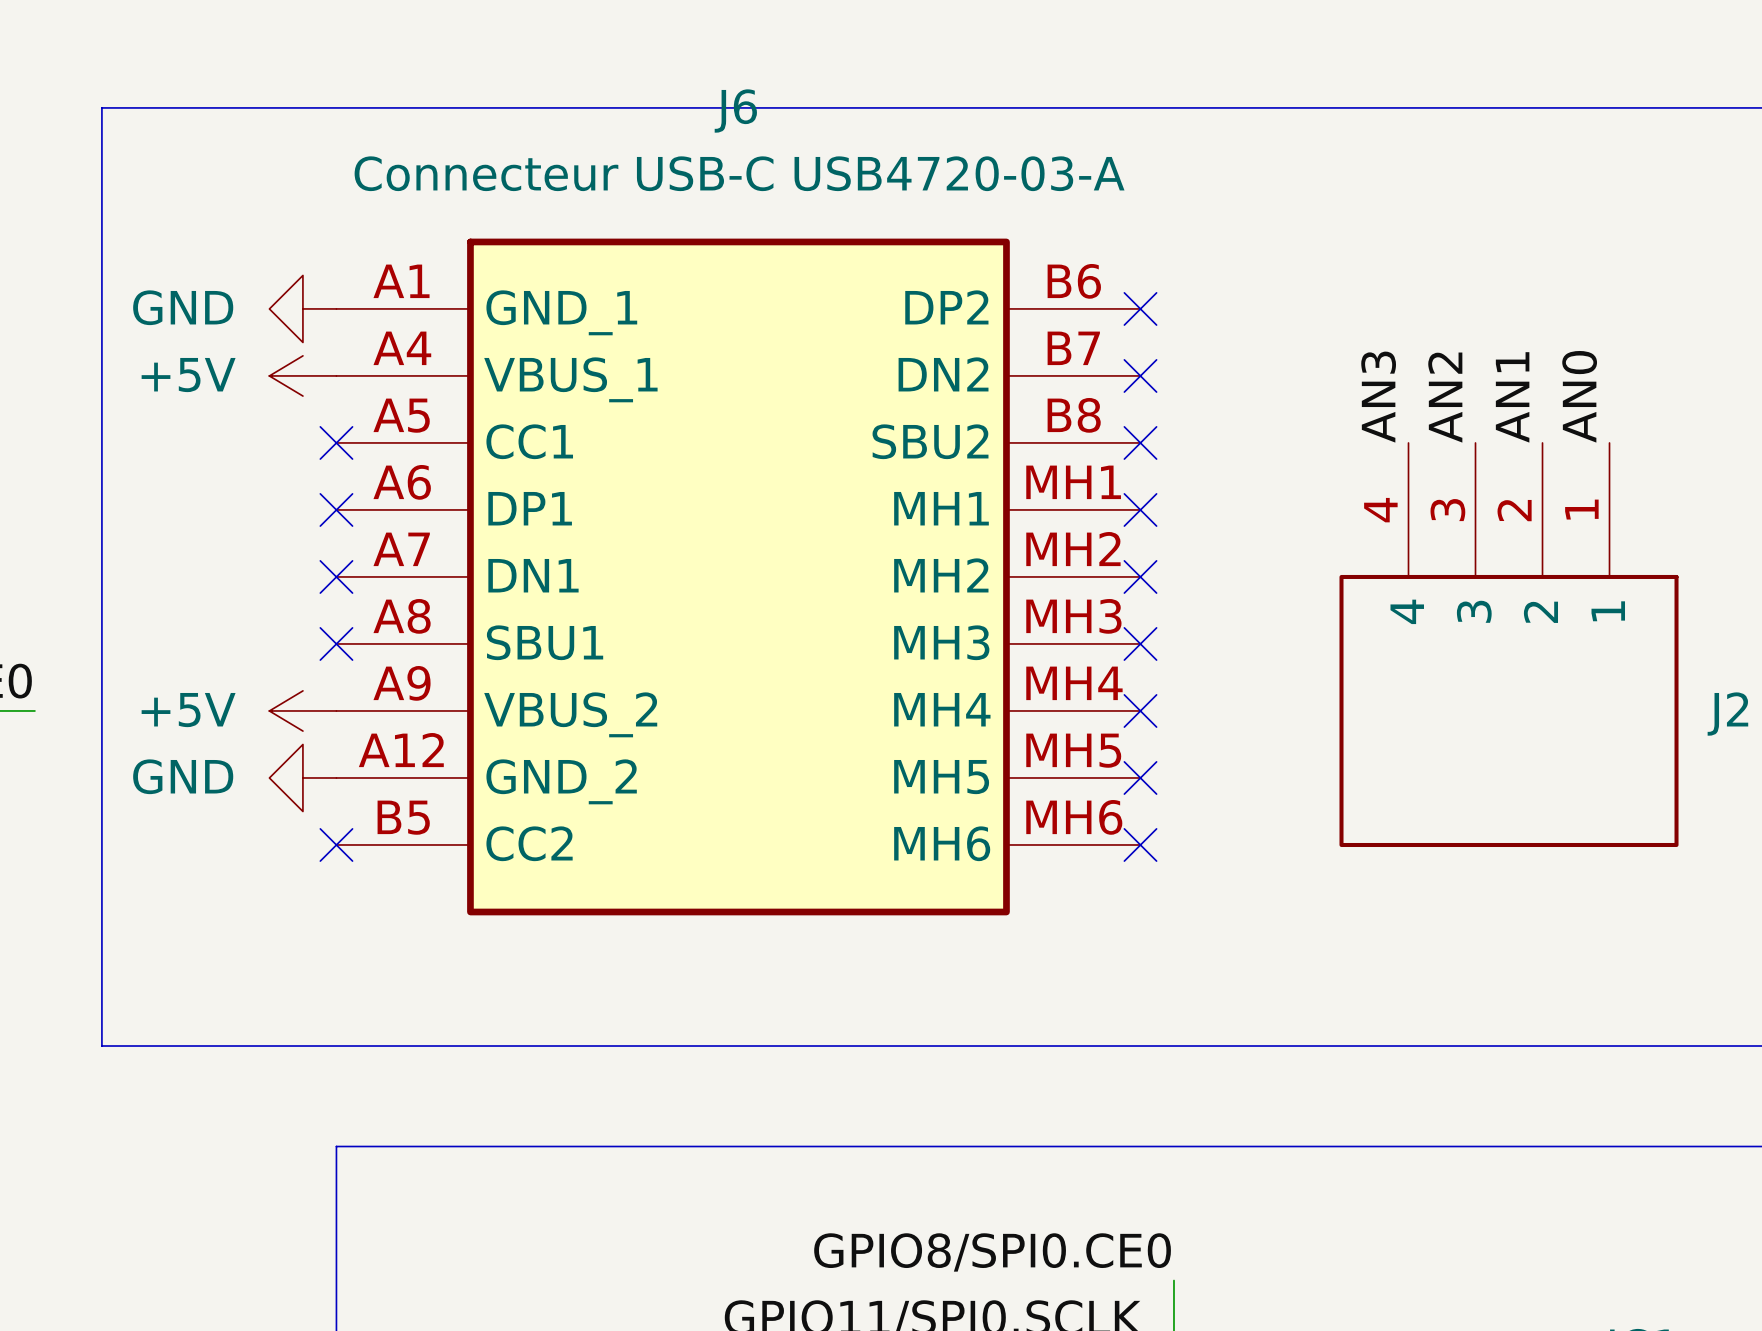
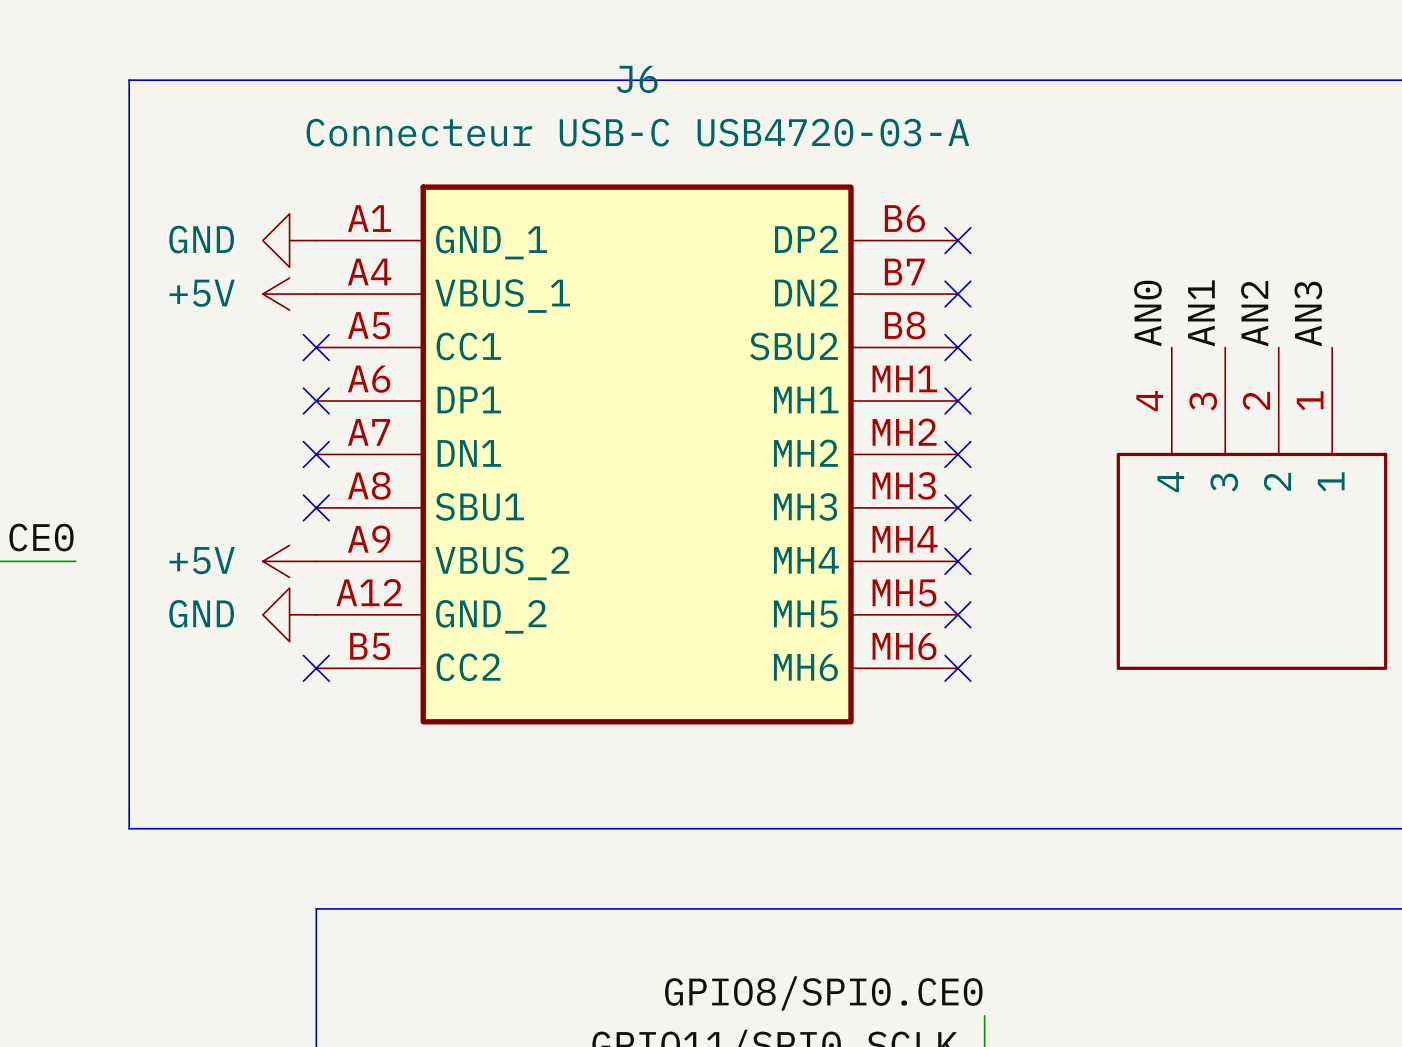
label: AN0 (1579, 396) -> AN3 (1308, 314)
label: AN3 (1378, 397) -> AN0 (1147, 313)
label: AN2 (1445, 397) -> AN1 (1201, 313)
label: AN1 (1512, 397) -> AN2 (1254, 313)

